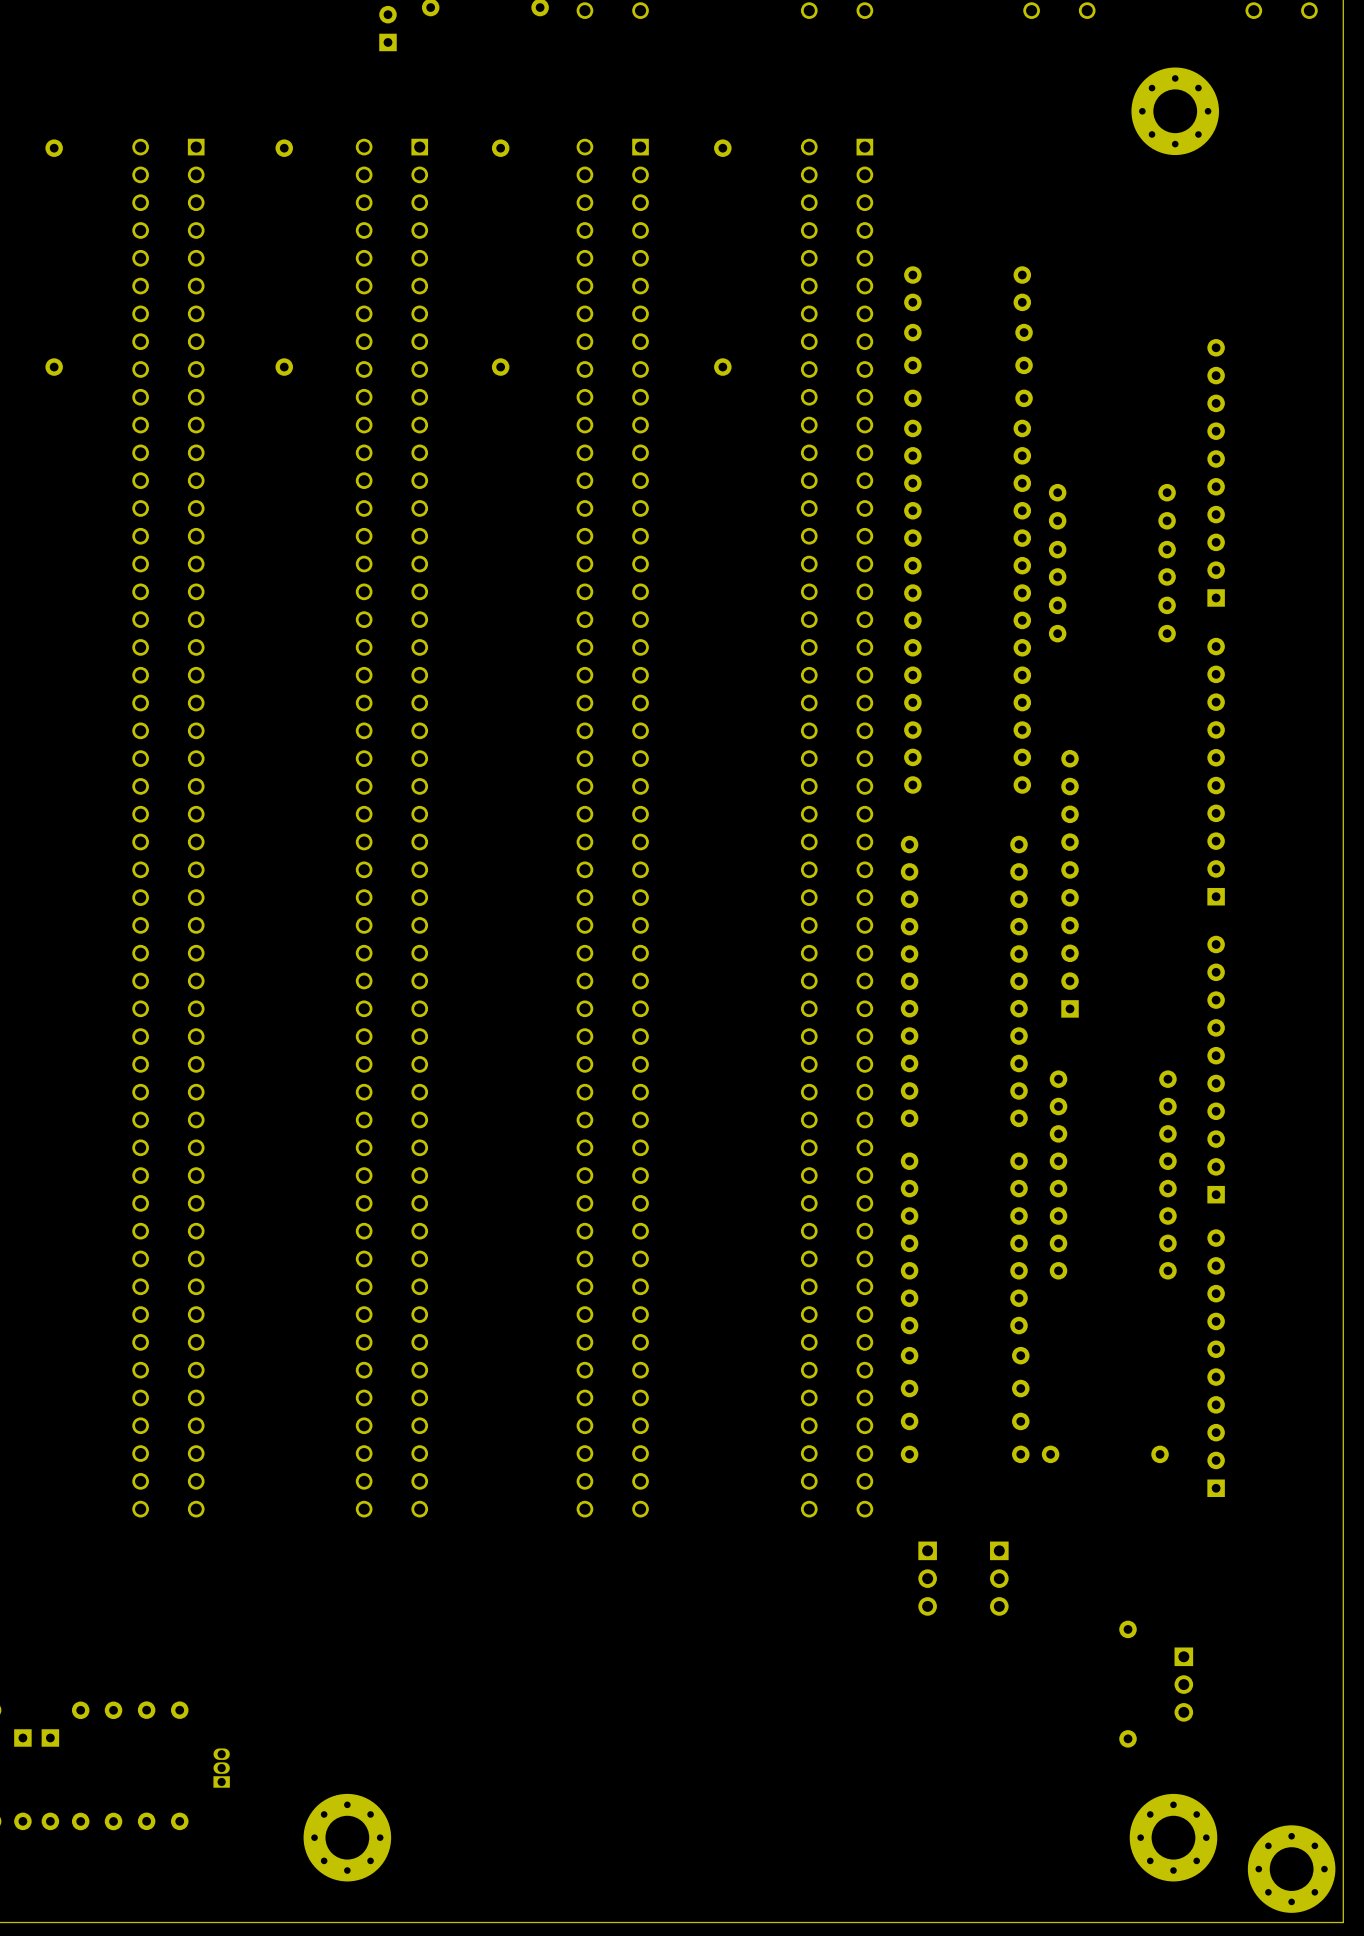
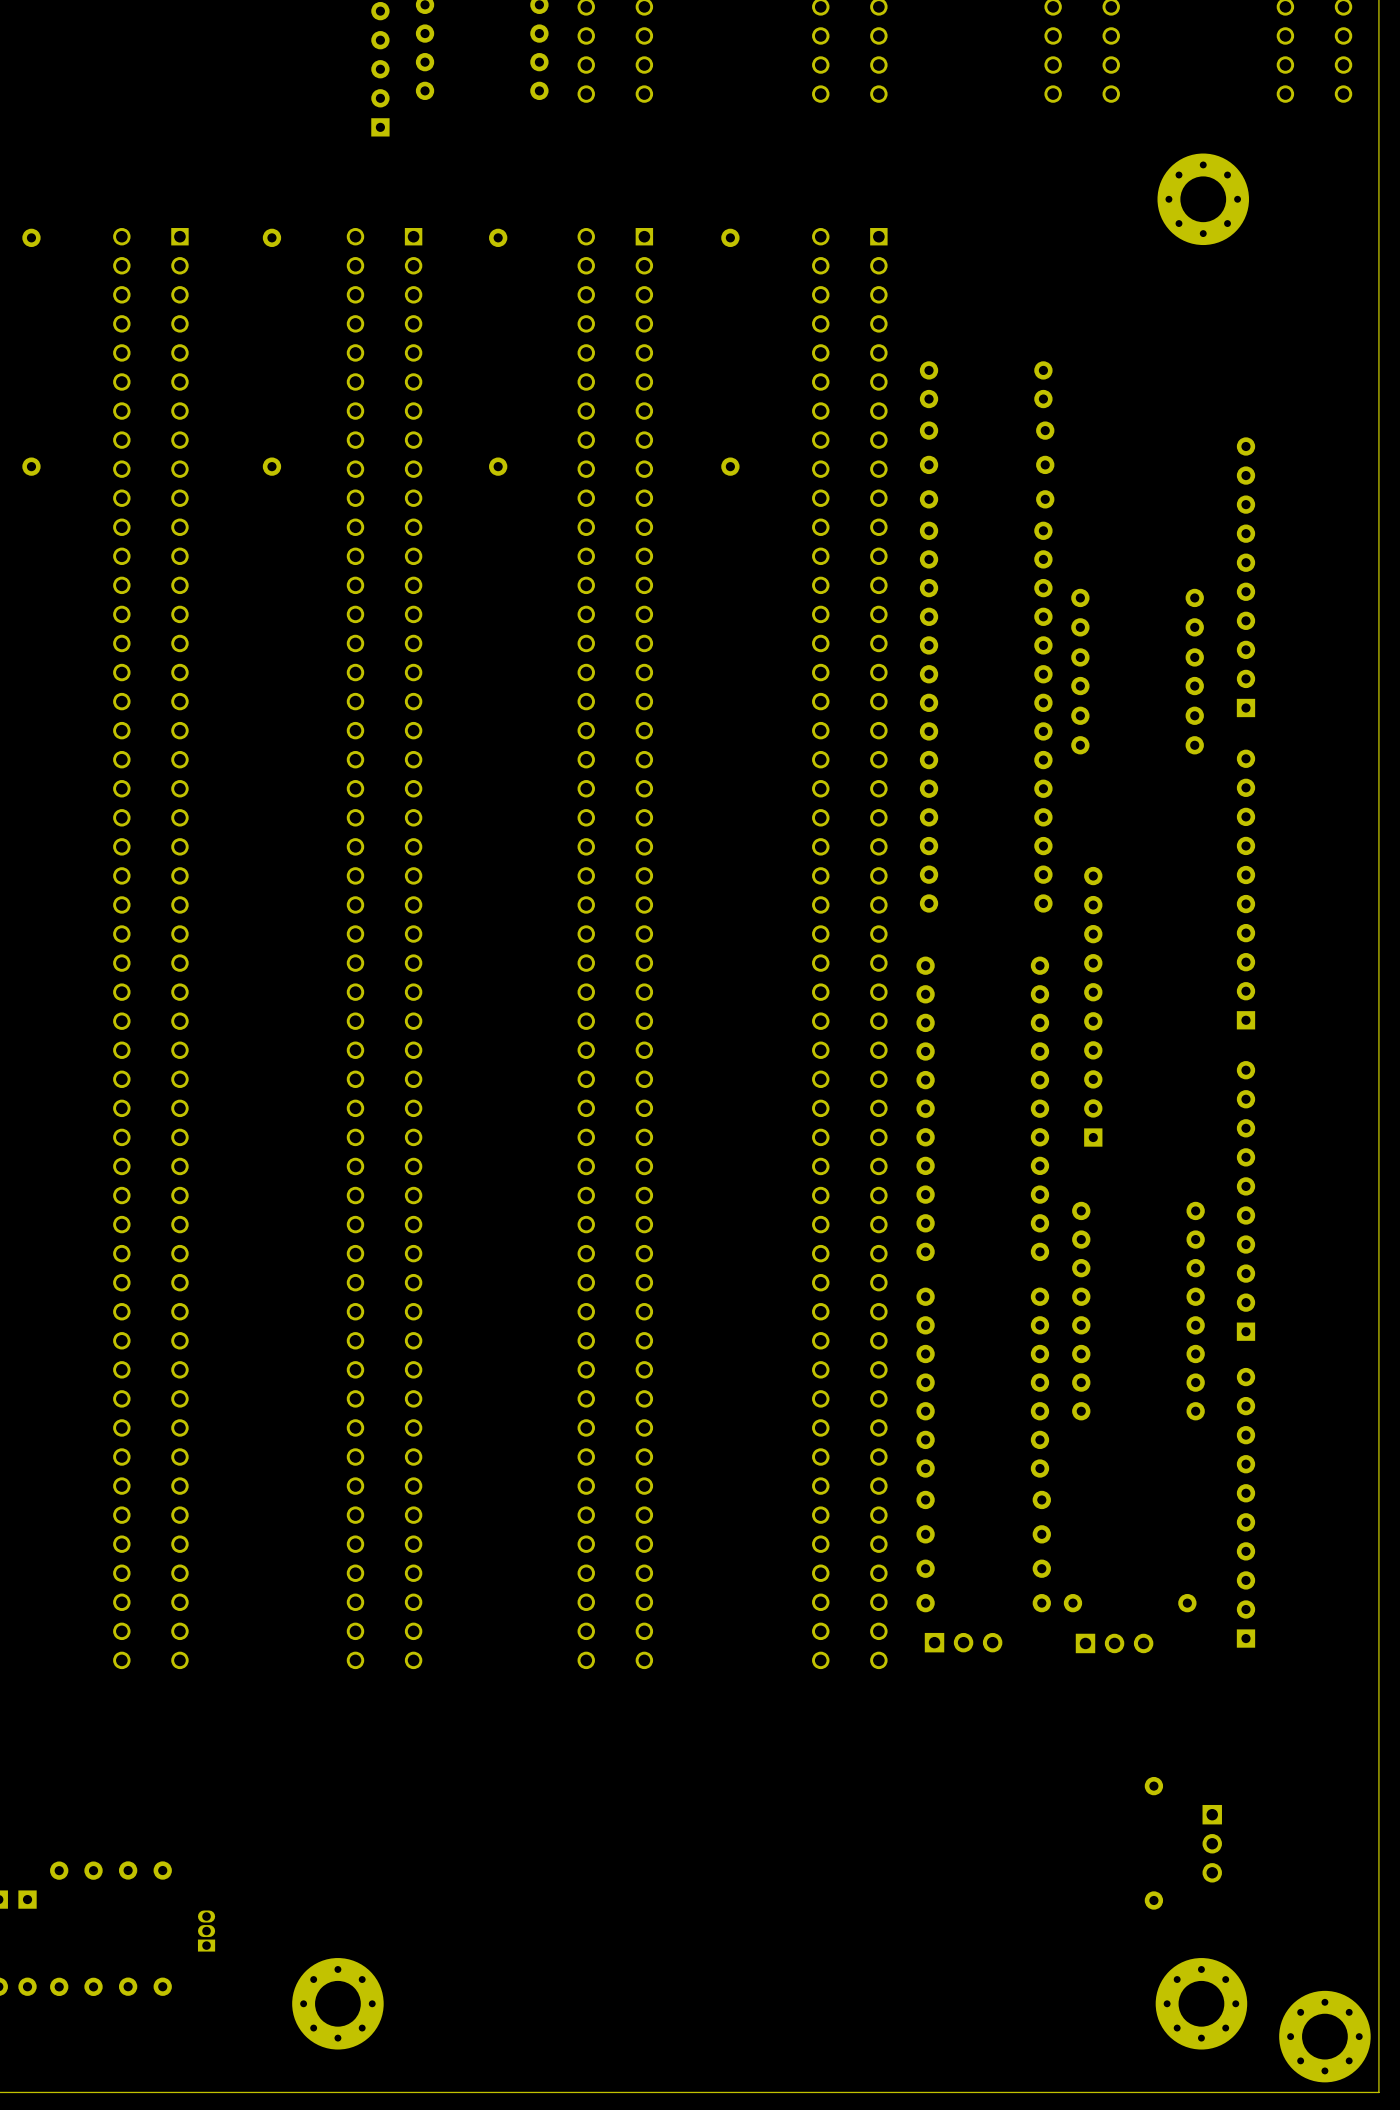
part: none -> (963, 1642)
part: none -> (1114, 1643)
part: (927, 1578) -> none
part: (999, 1578) -> none

